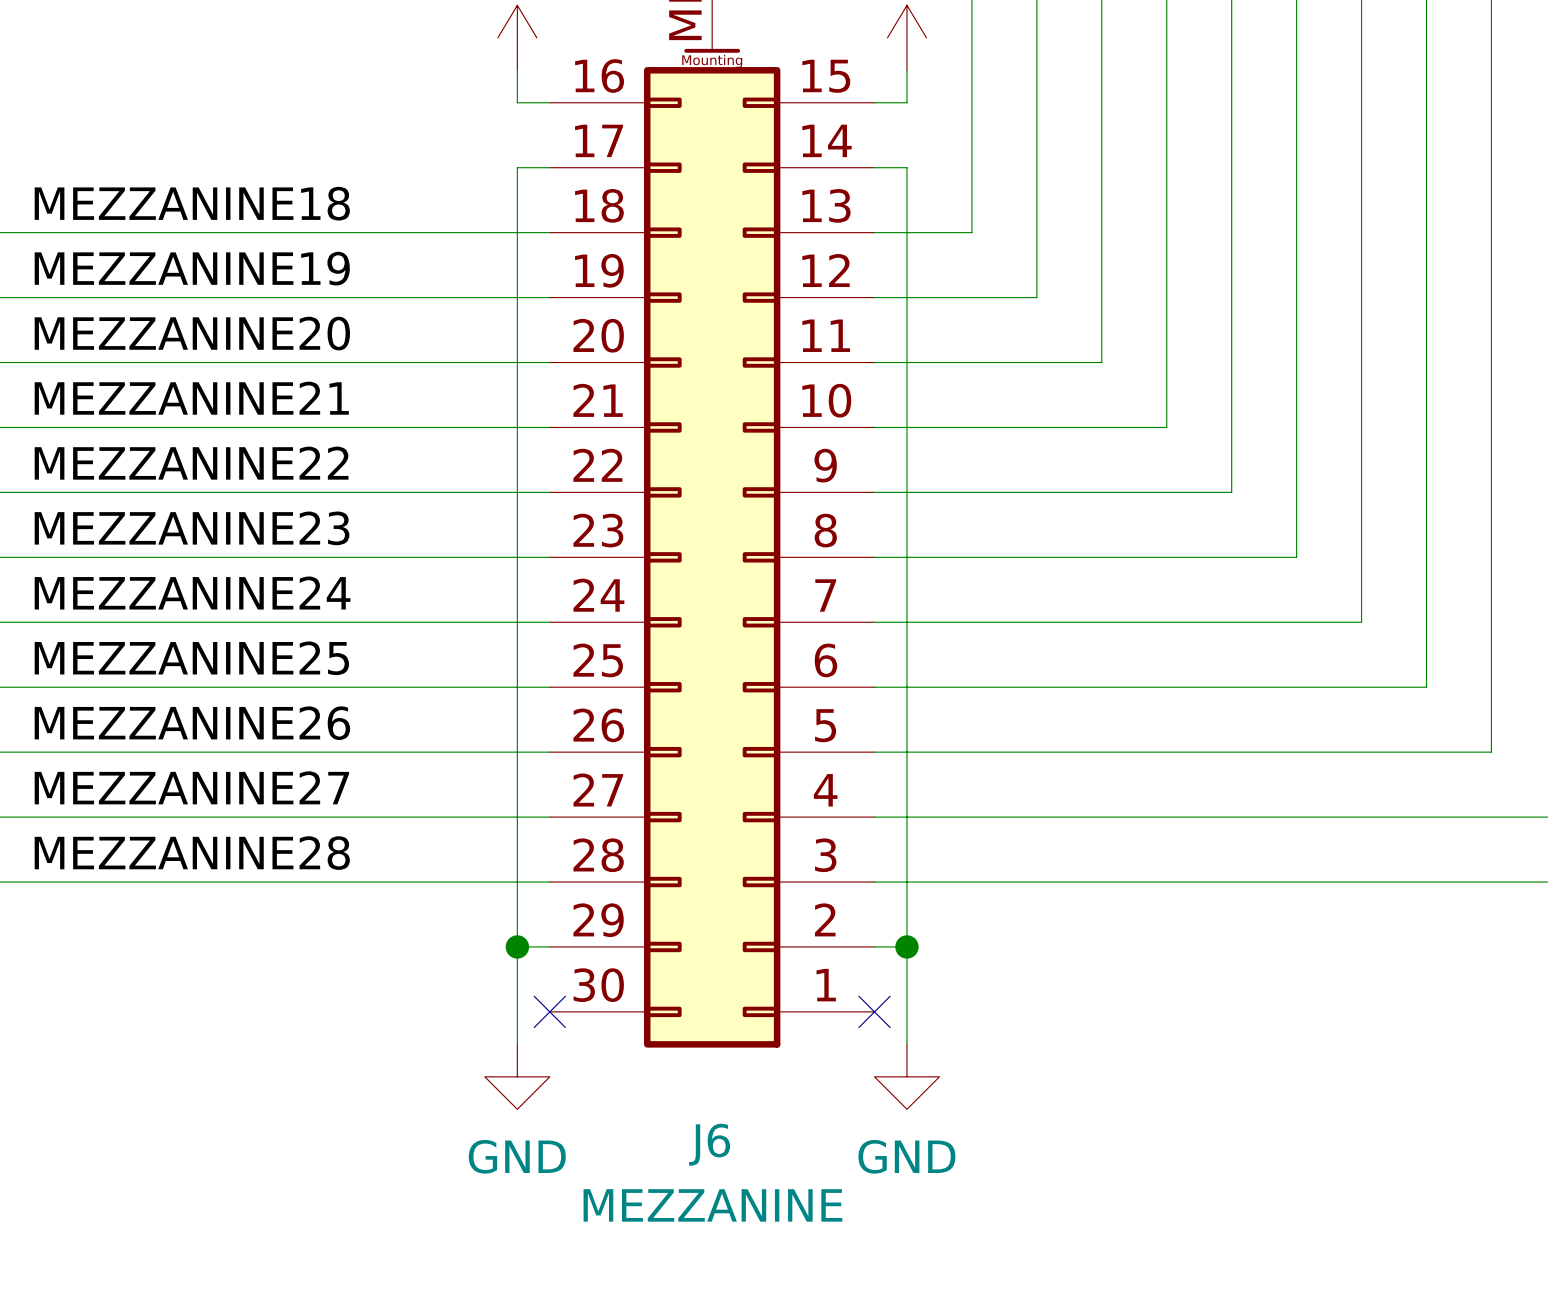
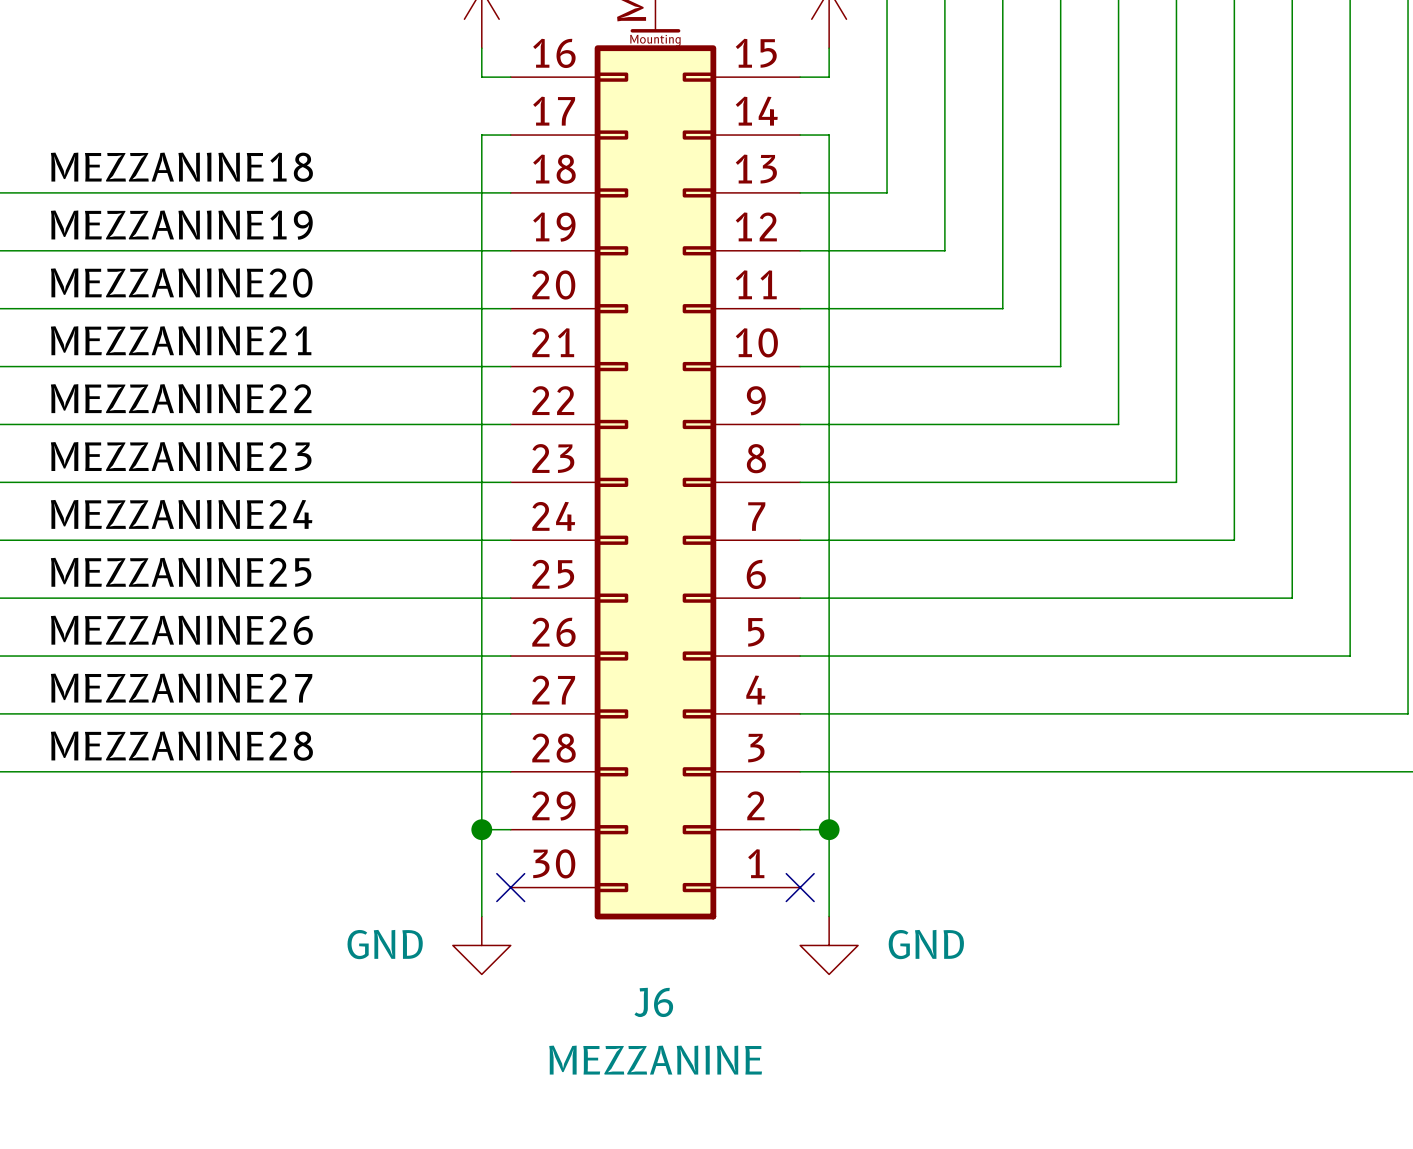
power symbol text position: GND (517, 1156) -> GND (385, 944)
power symbol text position: GND (906, 1156) -> GND (926, 944)

